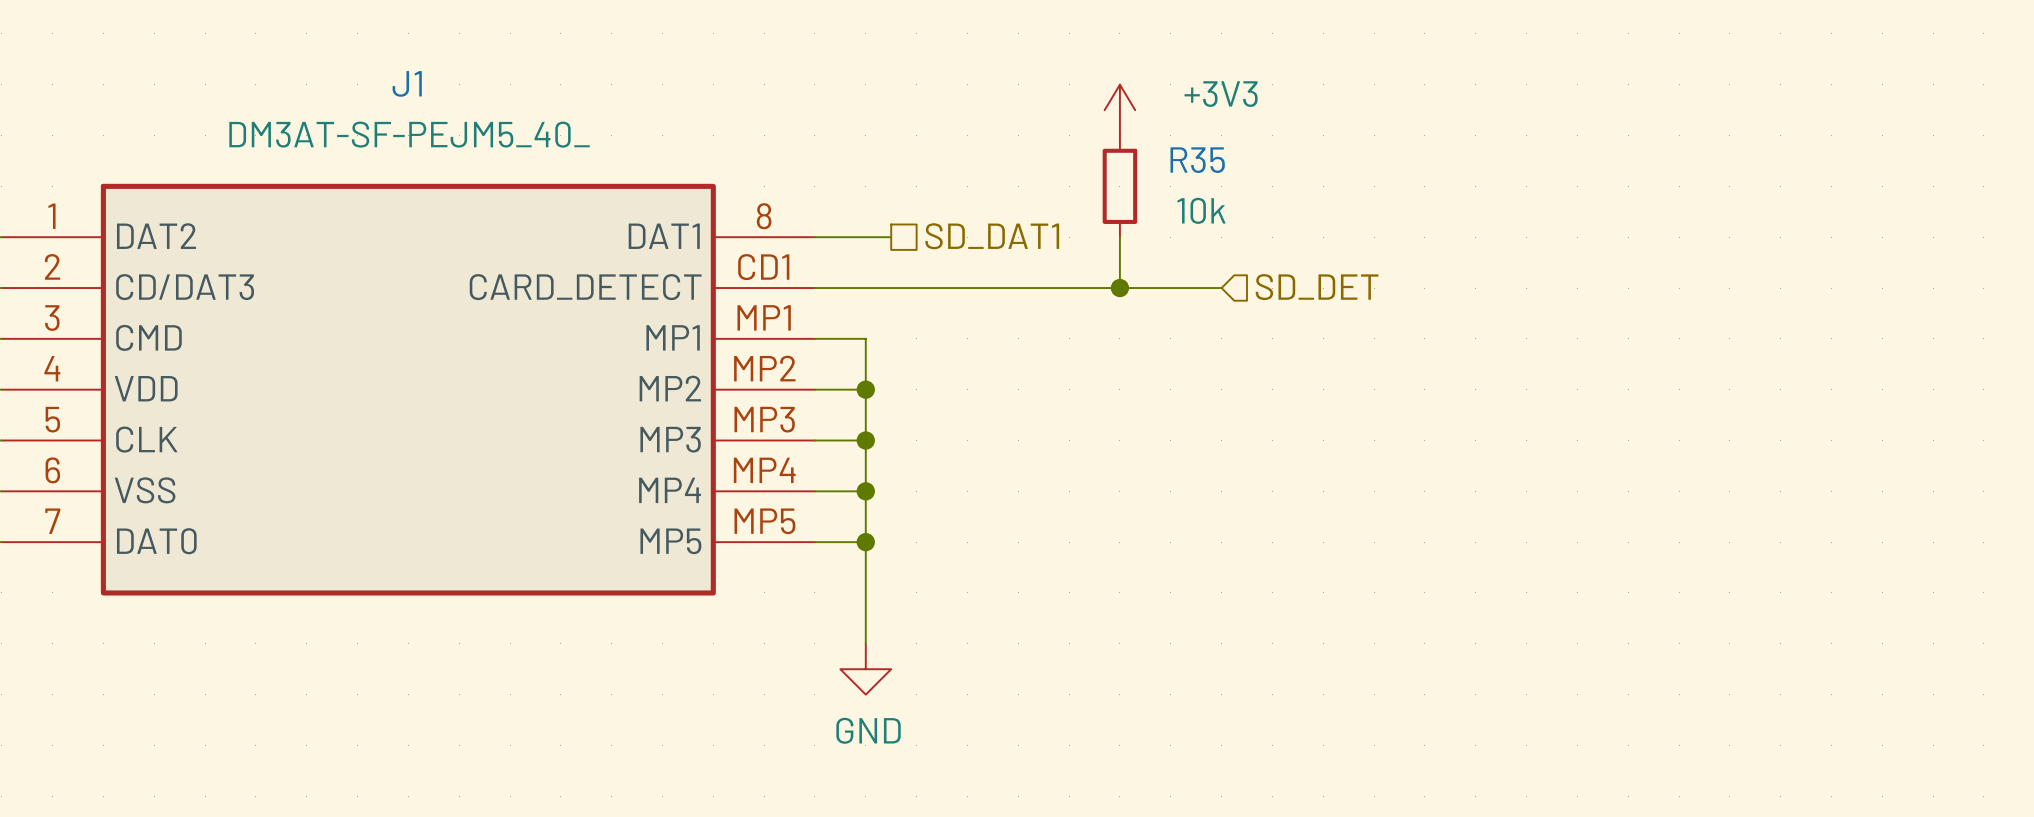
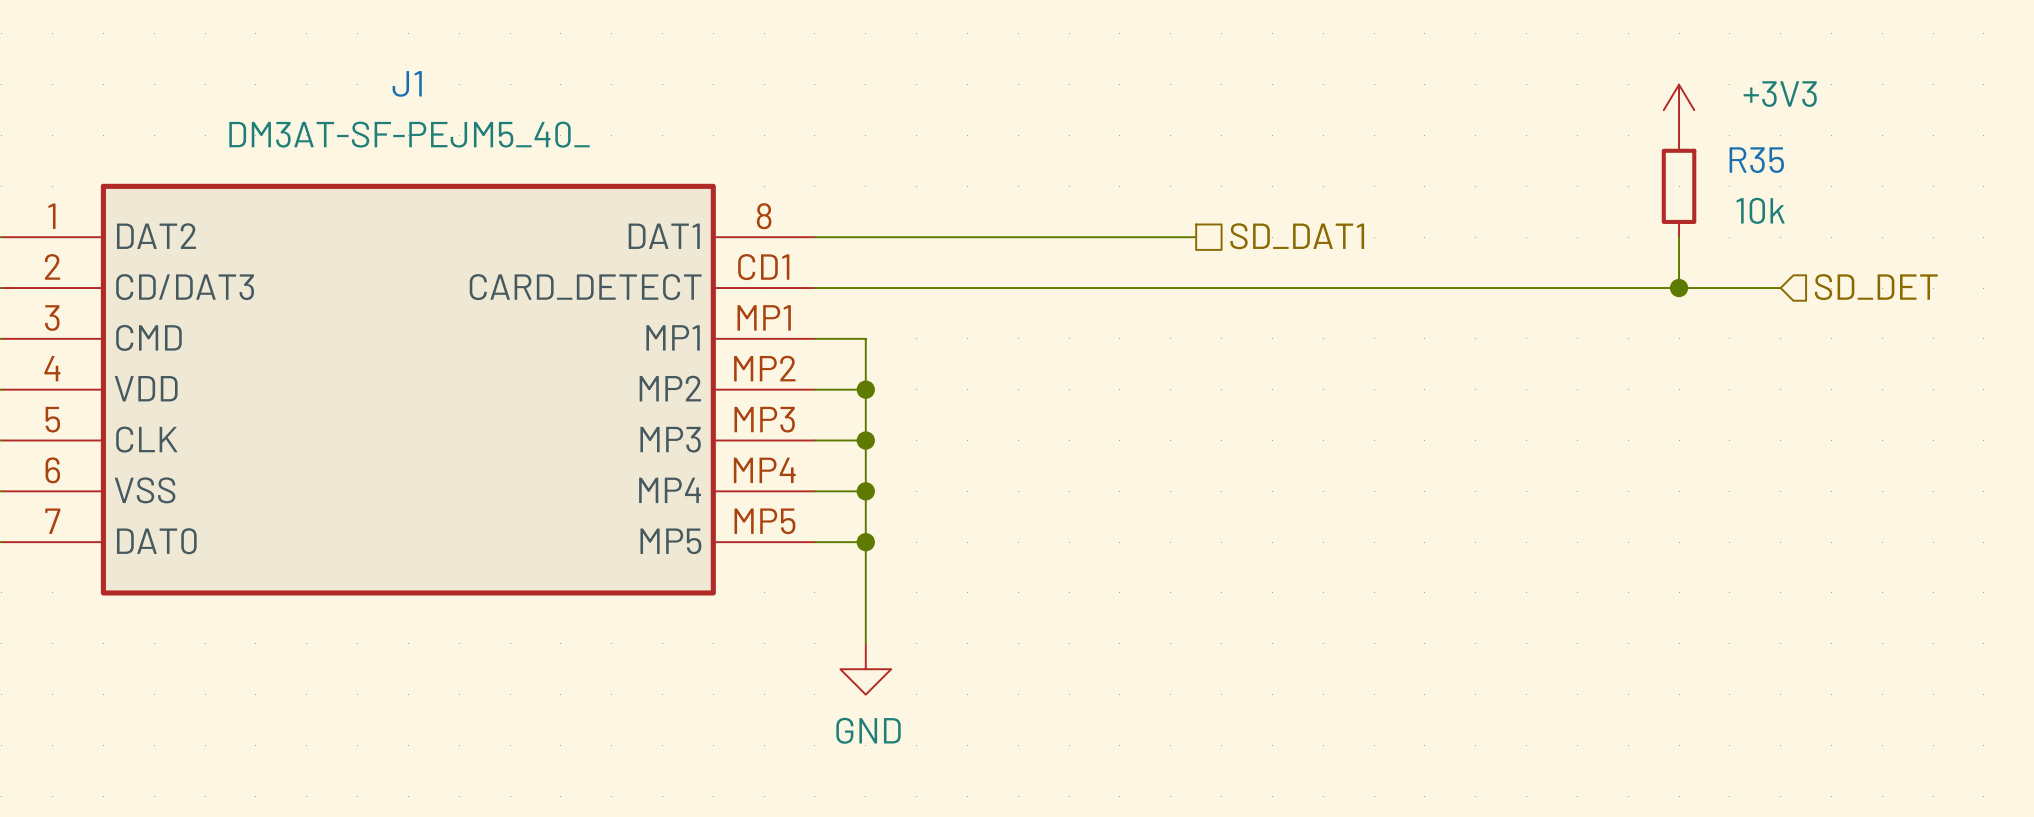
power symbol: +3V3 (1119, 110) -> none
power symbol: none -> +3V3 (1679, 110)
R35 position: (1119, 186) -> (1679, 186)
hierarchical label position: SD_DAT1 (992, 236) -> SD_DAT1 (1297, 236)
wire: none -> (891, 237) (1196, 237)
wire: (1119, 237) (1119, 288) -> none
wire: none -> (1679, 237) (1679, 288)
hierarchical label: SD_DET (1317, 287) -> none
hierarchical label: none -> SD_DET (1876, 287)
junction: (1119, 288) -> none
wire: none -> (1221, 288) (1780, 288)
junction: none -> (1679, 288)

